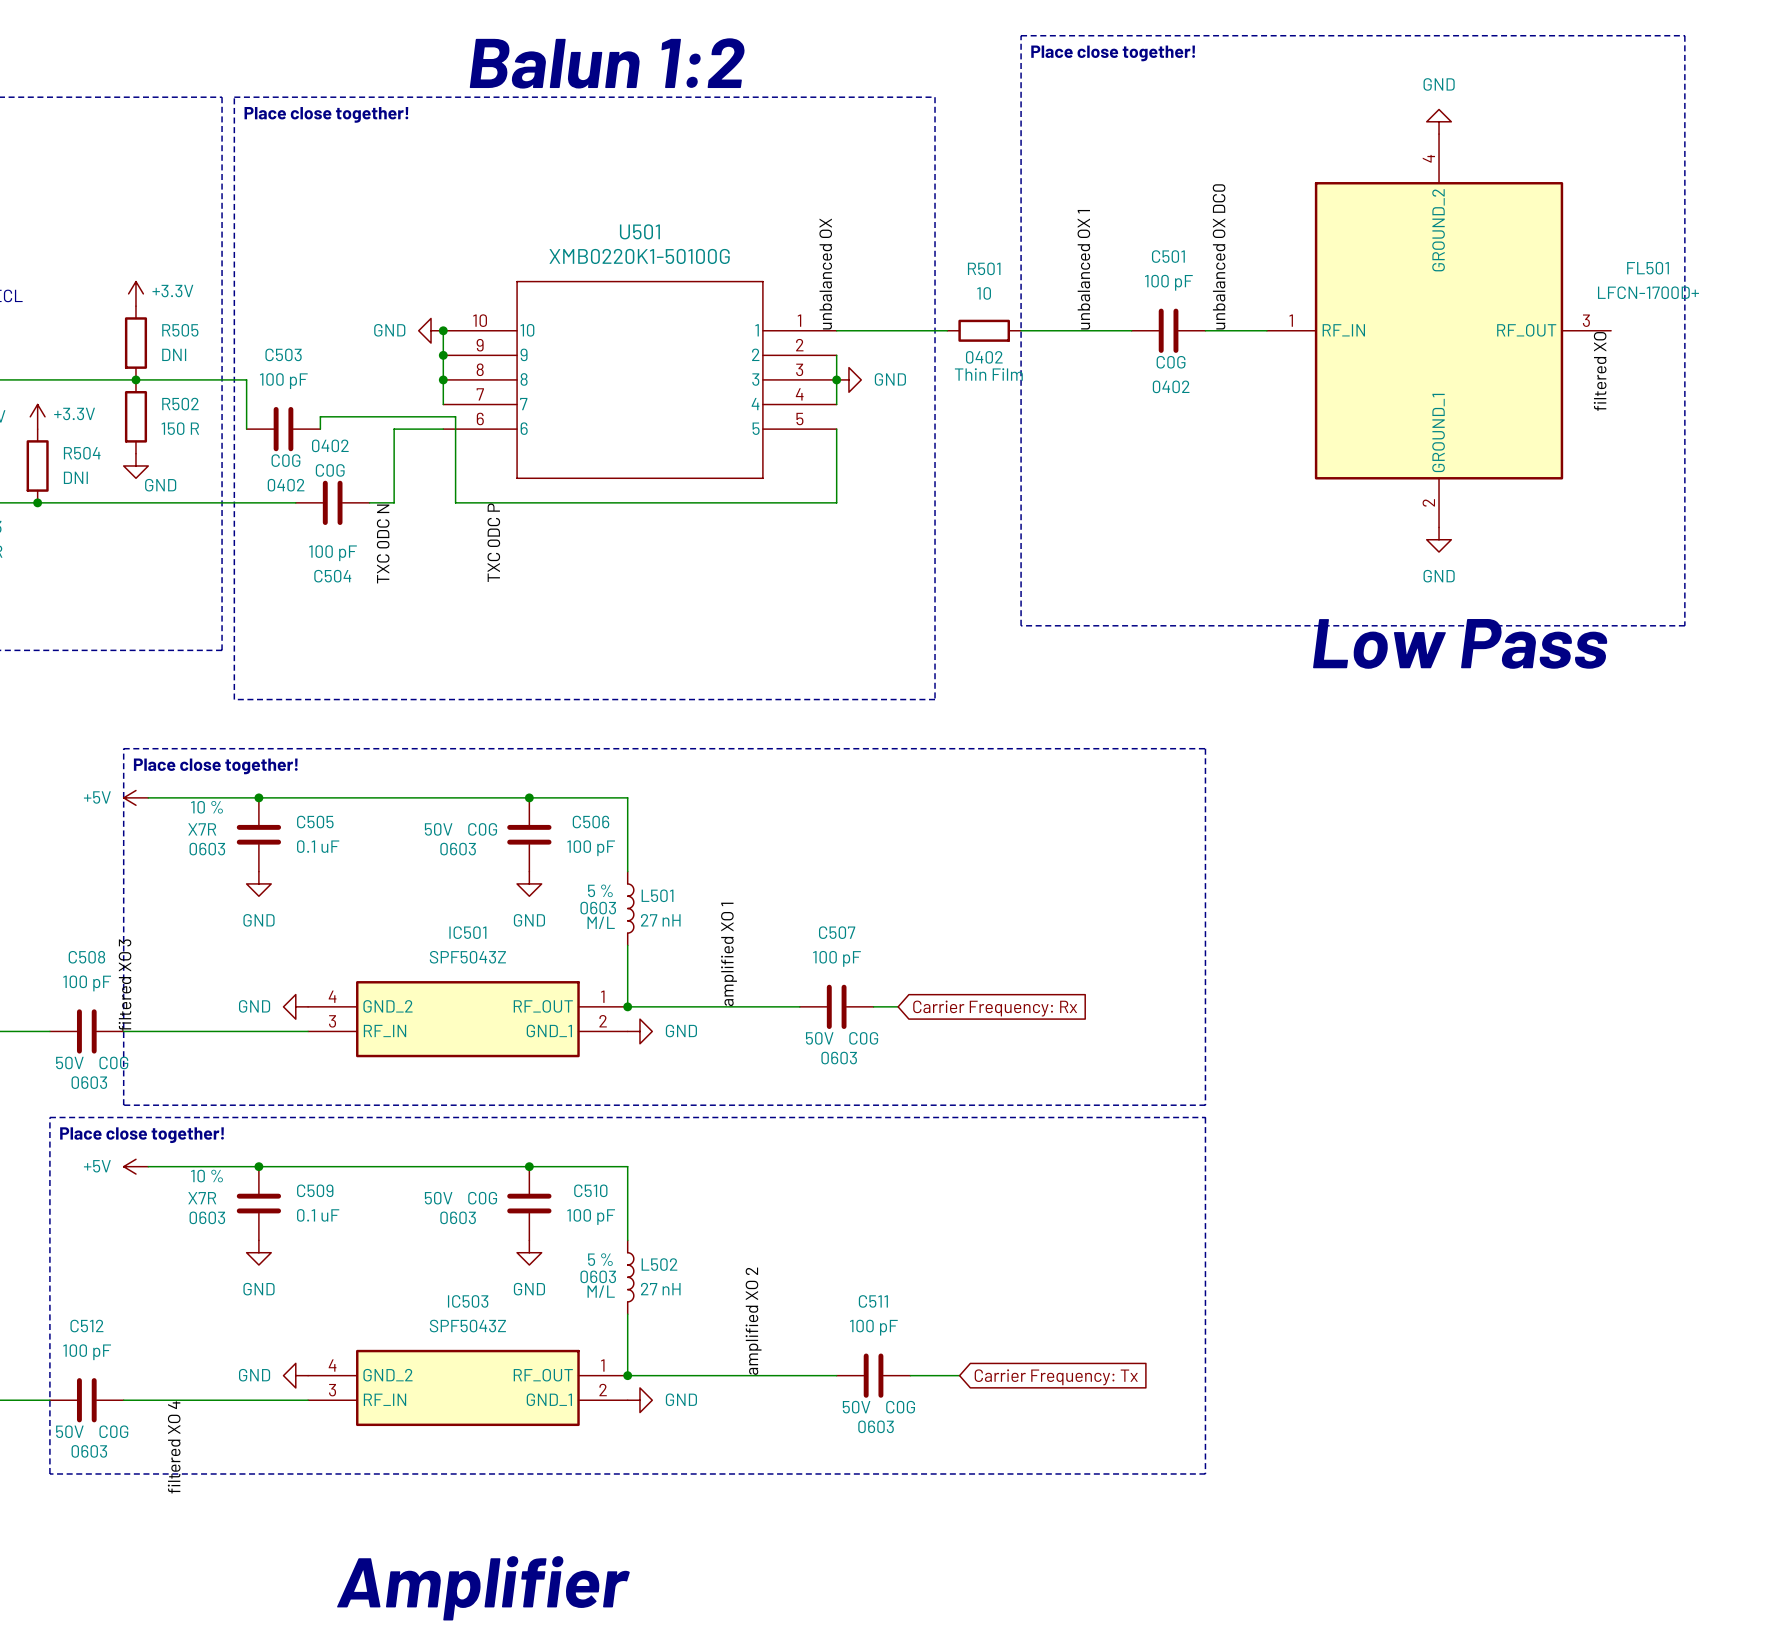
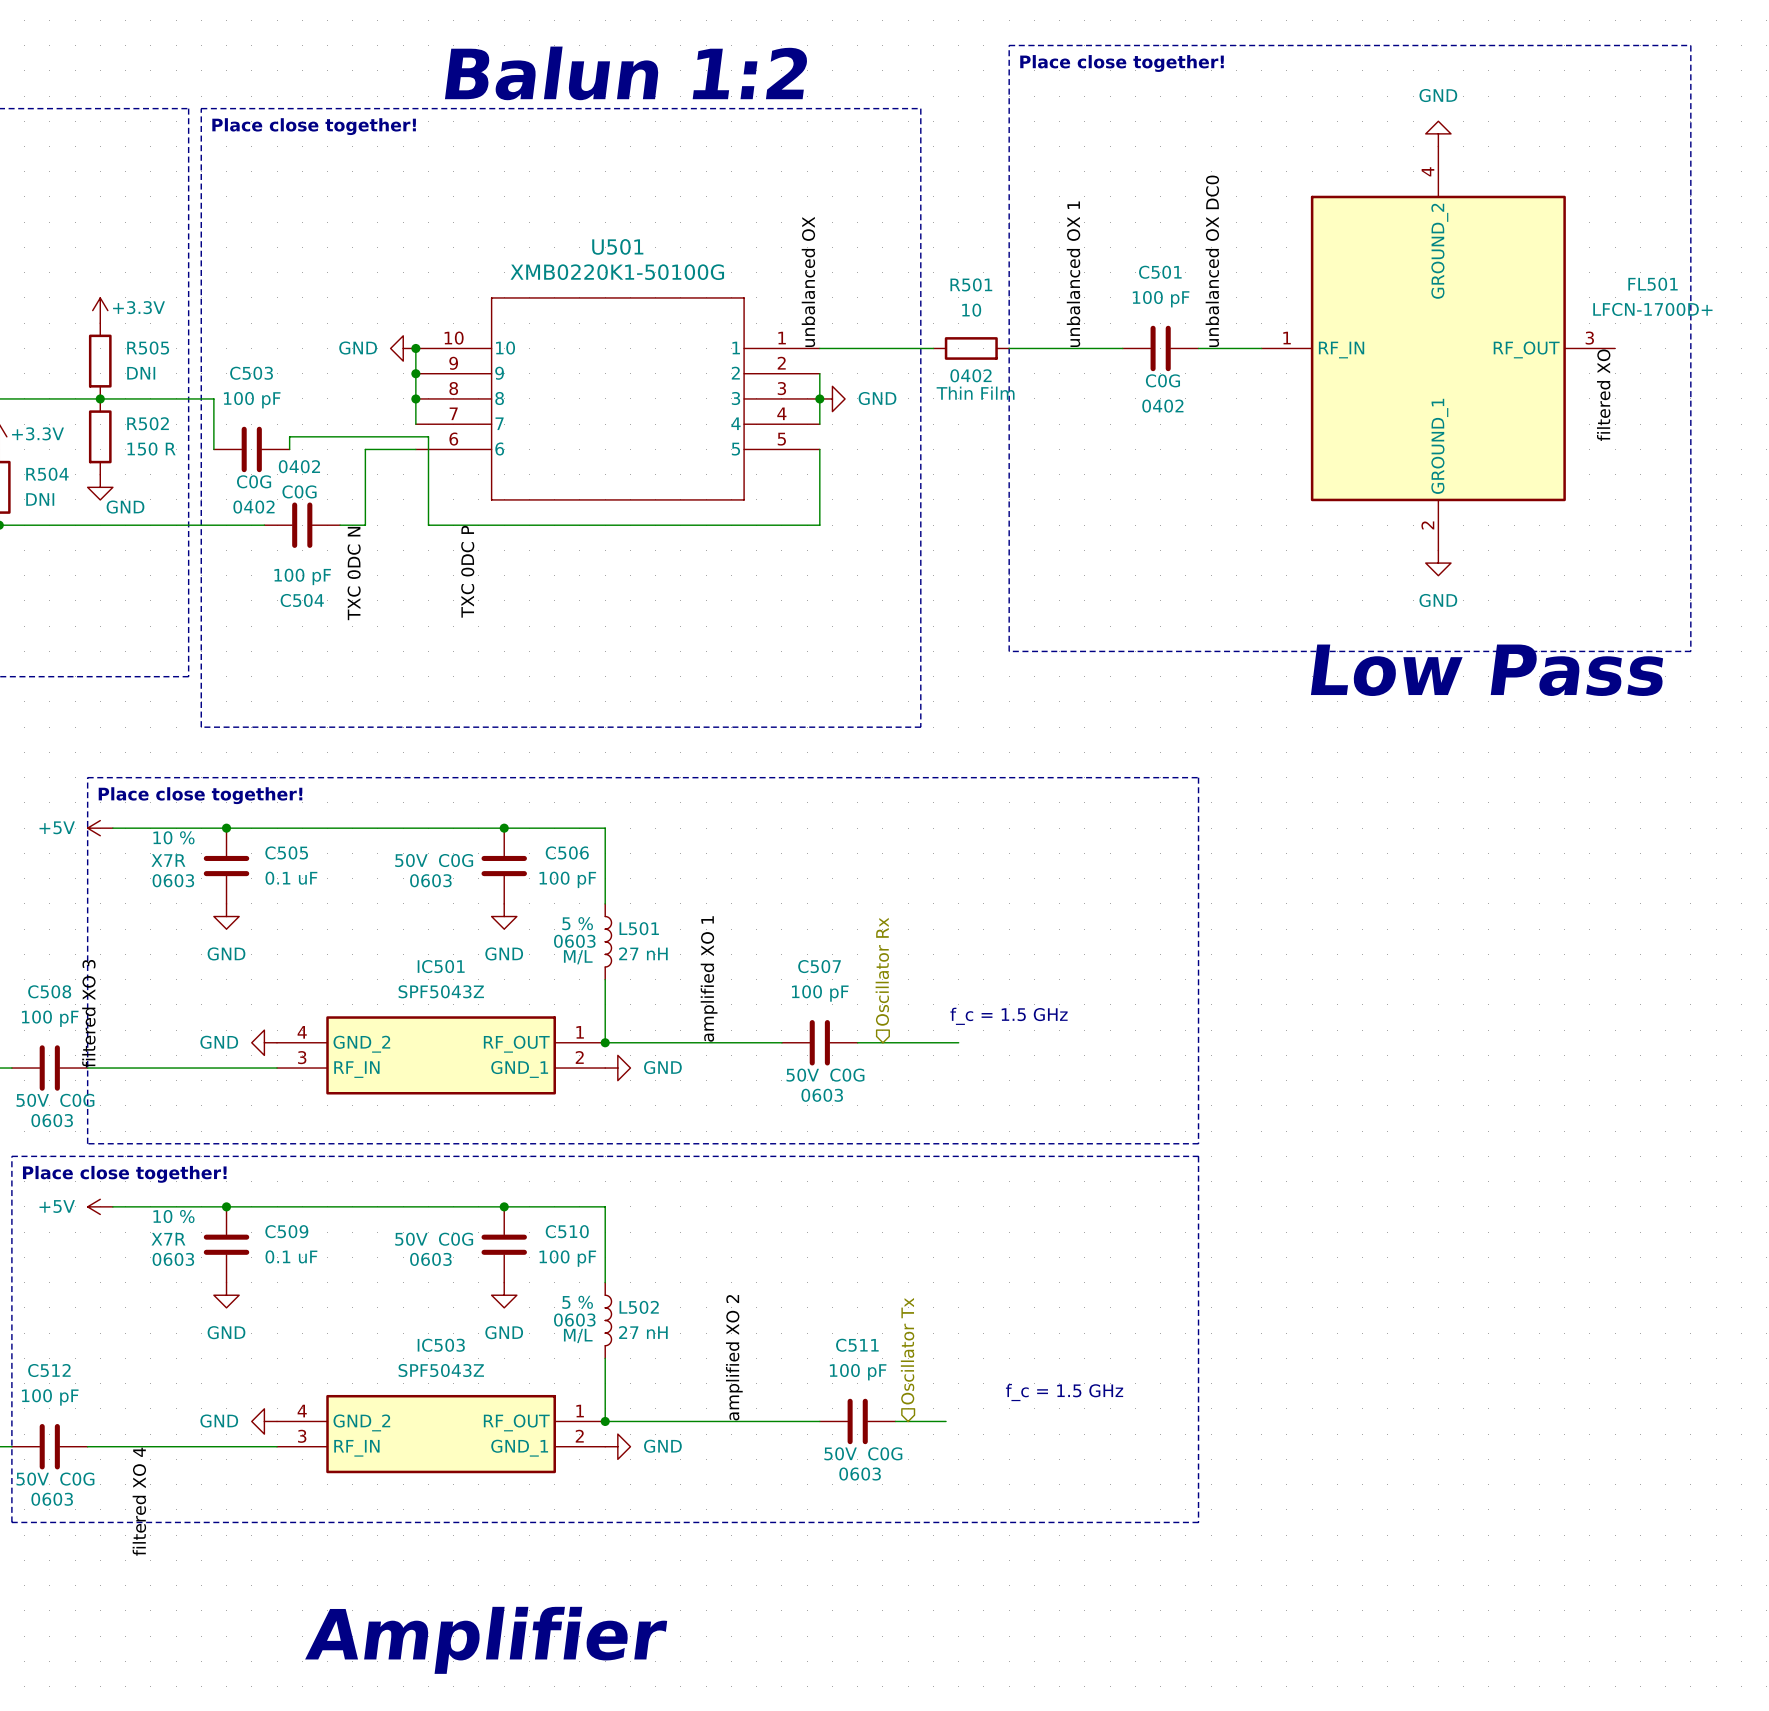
hierarchical label: none -> Oscillator Rx (882, 971)
text: none -> f_c = 1.5 GHz (1008, 1016)
wire: none -> (882, 1042) (958, 1042)
global label: Carrier Frequency: Rx (995, 1008) -> none
hierarchical label: none -> Oscillator Tx (907, 1351)
text: none -> f_c = 1.5 GHz (1064, 1392)
global label: Carrier Frequency: Tx (1056, 1377) -> none

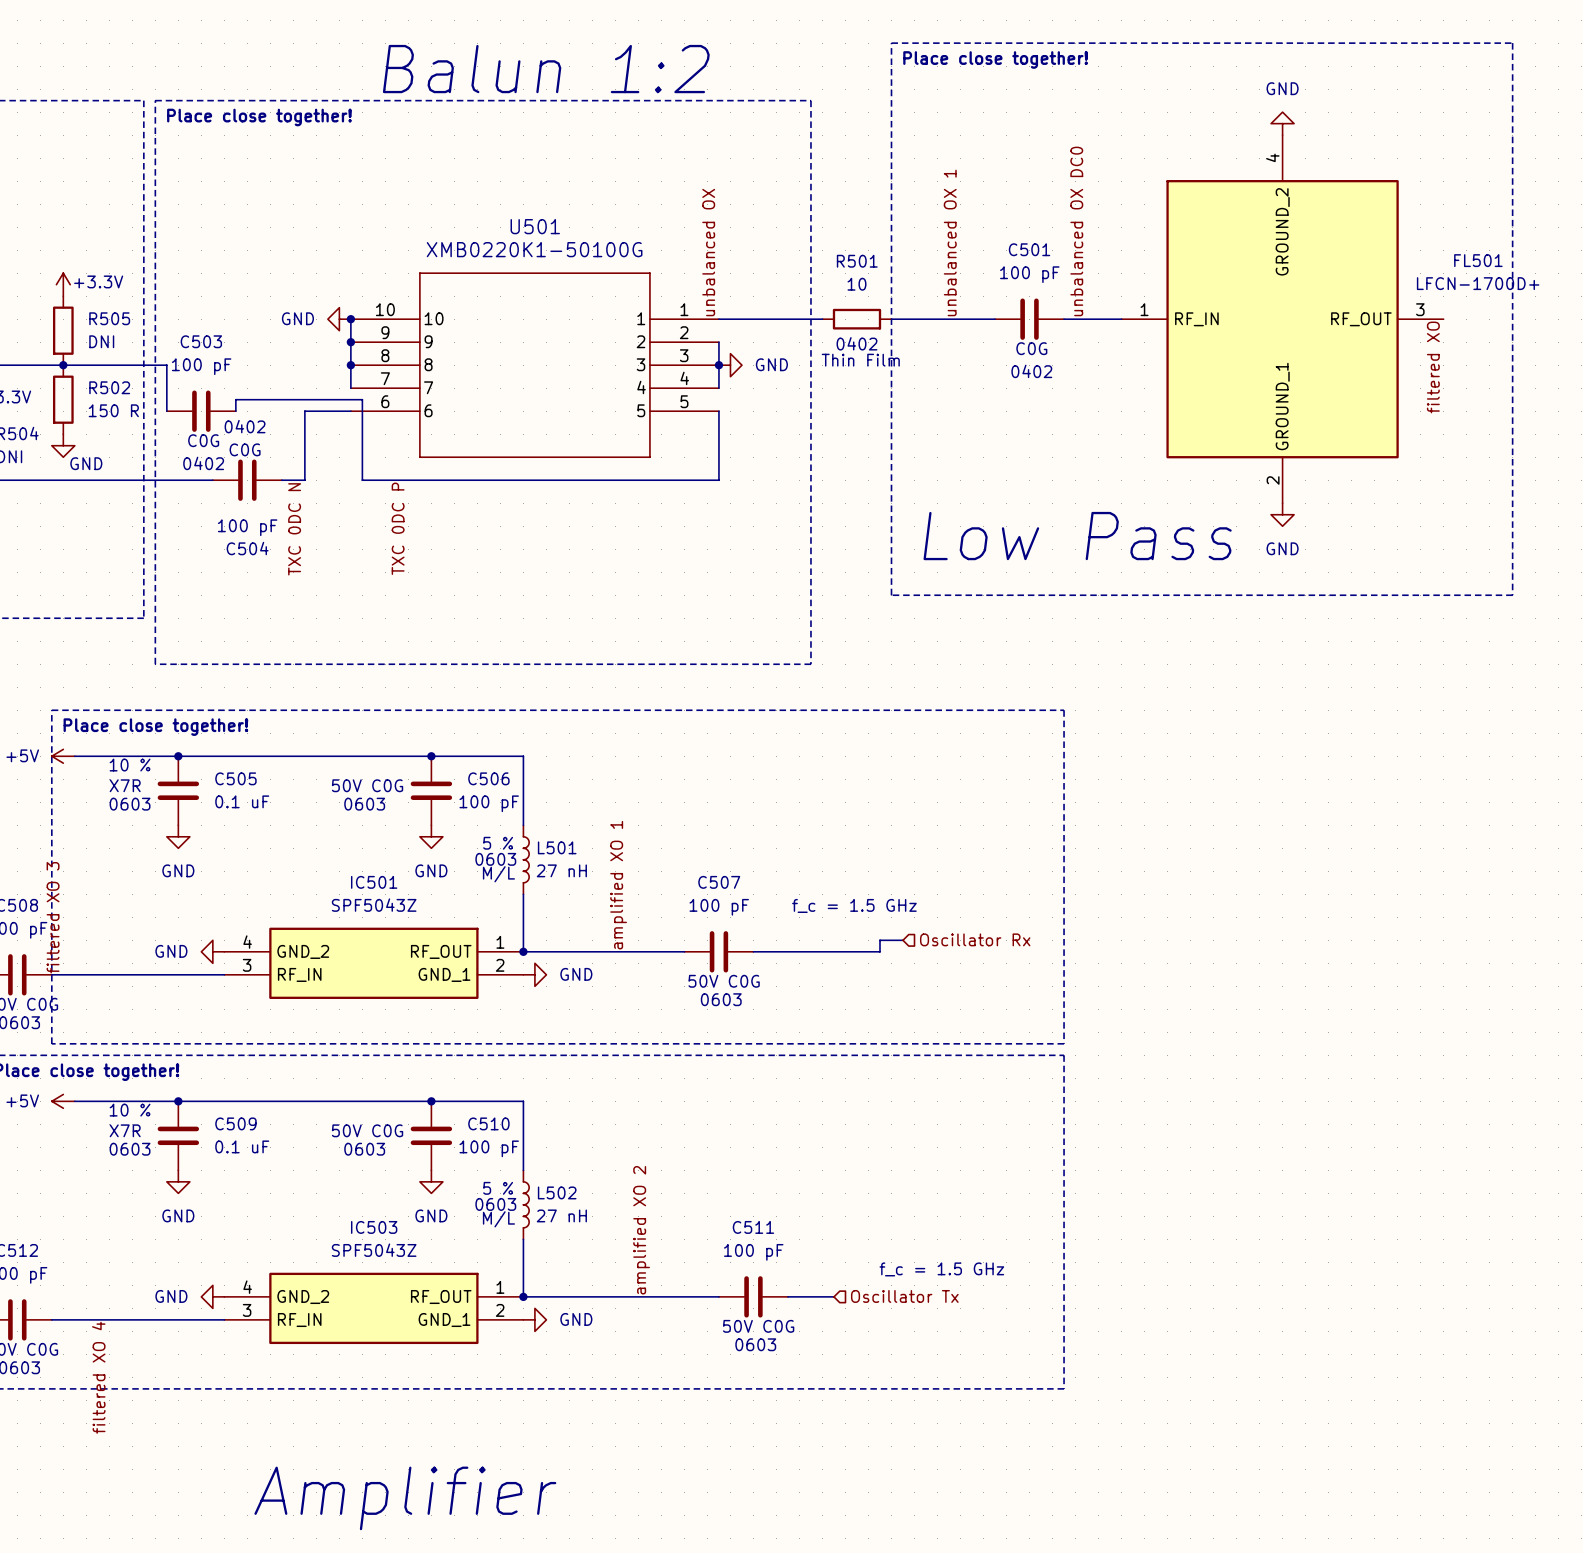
text: none -> Low Pass (1077, 536)
text: Low Pass (1487, 670) -> none
hierarchical label rotation: 0° (882, 971) -> 90° clockwise (975, 939)
hierarchical label position: Oscillator Rx (882, 971) -> Oscillator Rx (975, 939)
text position: f_c = 1.5 GHz (1008, 1016) -> f_c = 1.5 GHz (854, 905)
wire: none -> (903, 940) (879, 940) (879, 951) (845, 951)
hierarchical label rotation: 0° (907, 1351) -> 90° clockwise (904, 1296)
hierarchical label position: Oscillator Tx (907, 1351) -> Oscillator Tx (904, 1296)

